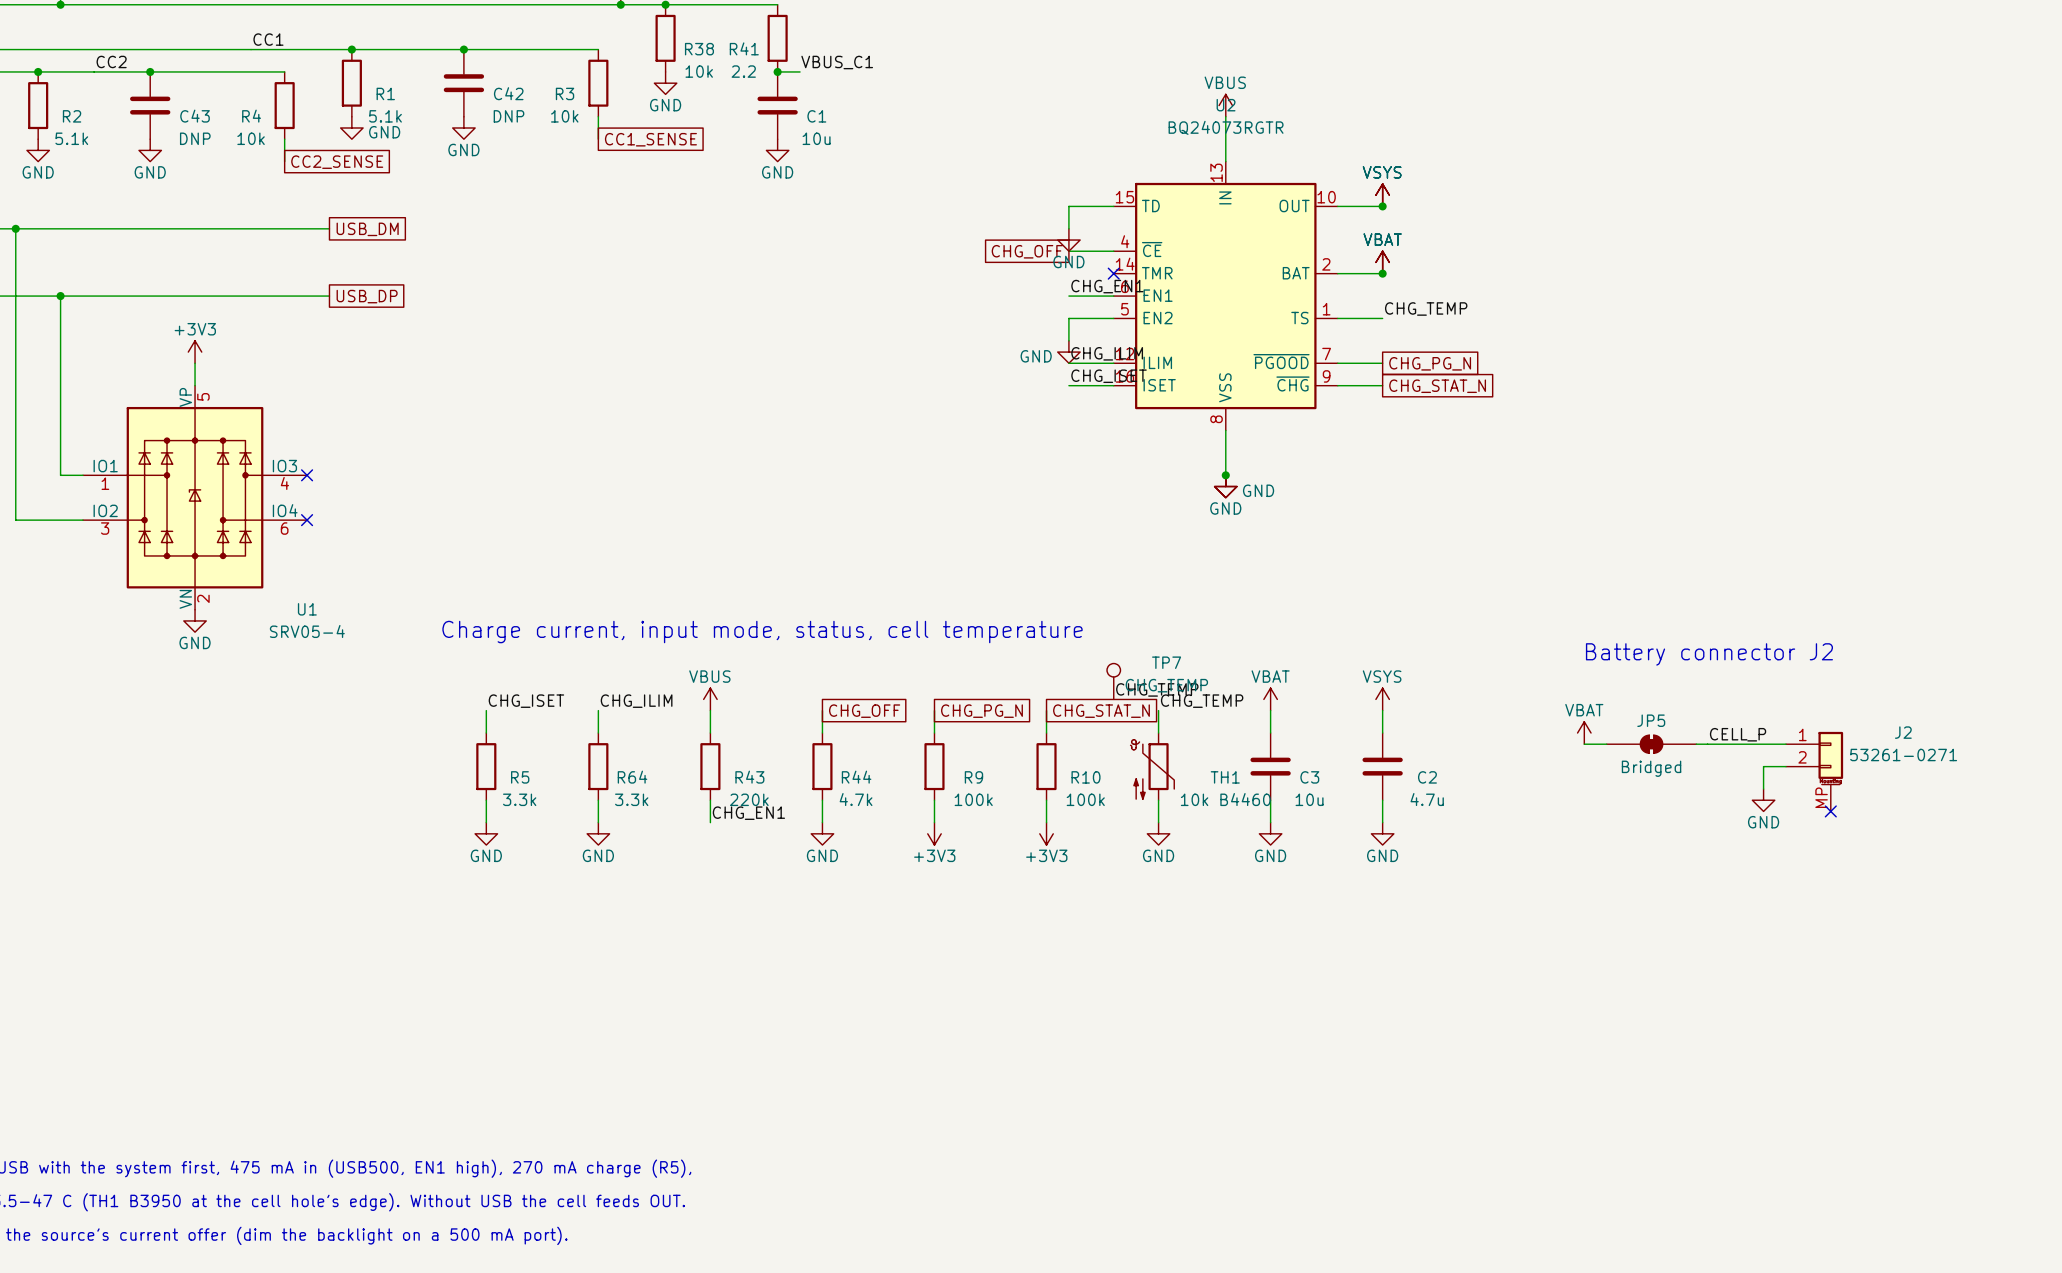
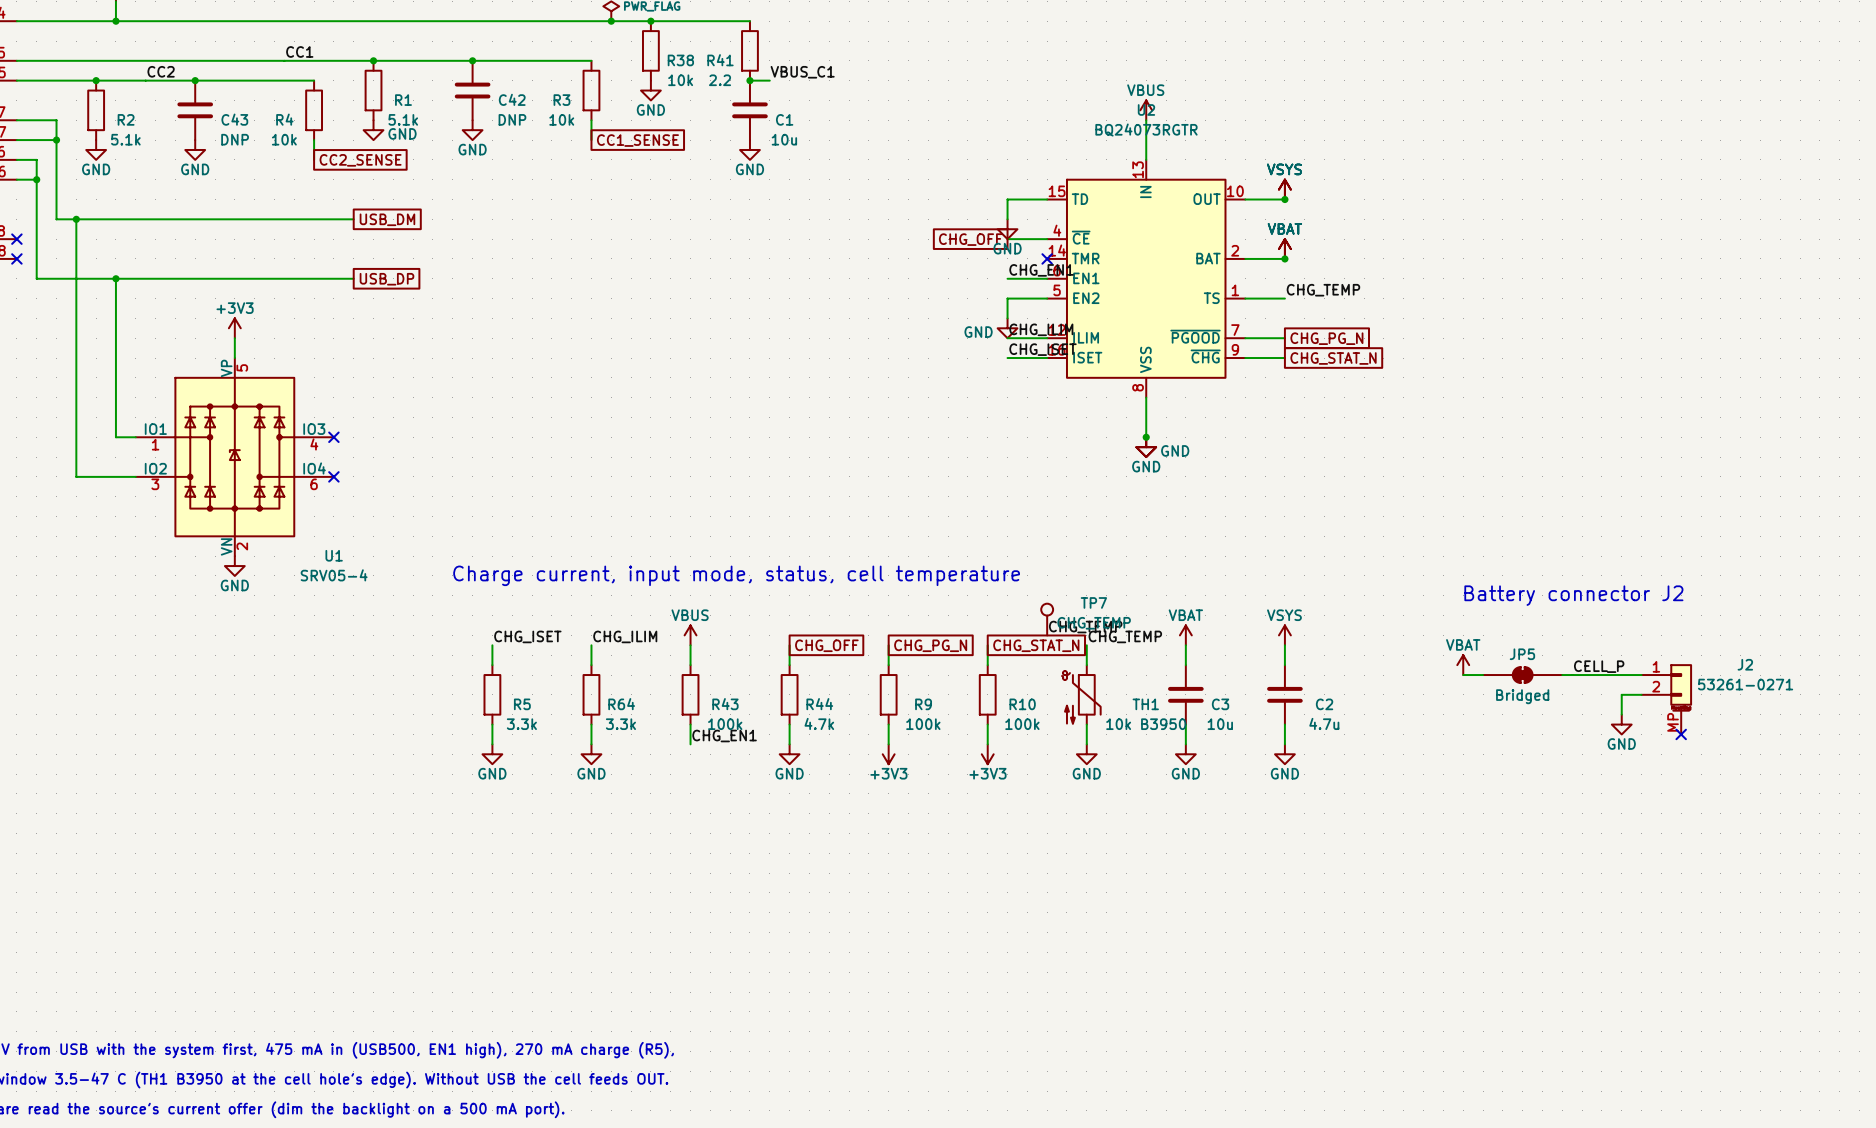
R43 value: 220k (749, 799) -> 100k (725, 724)
TH1 value: 10k B4460 (1225, 799) -> 10k B3950 (1146, 724)

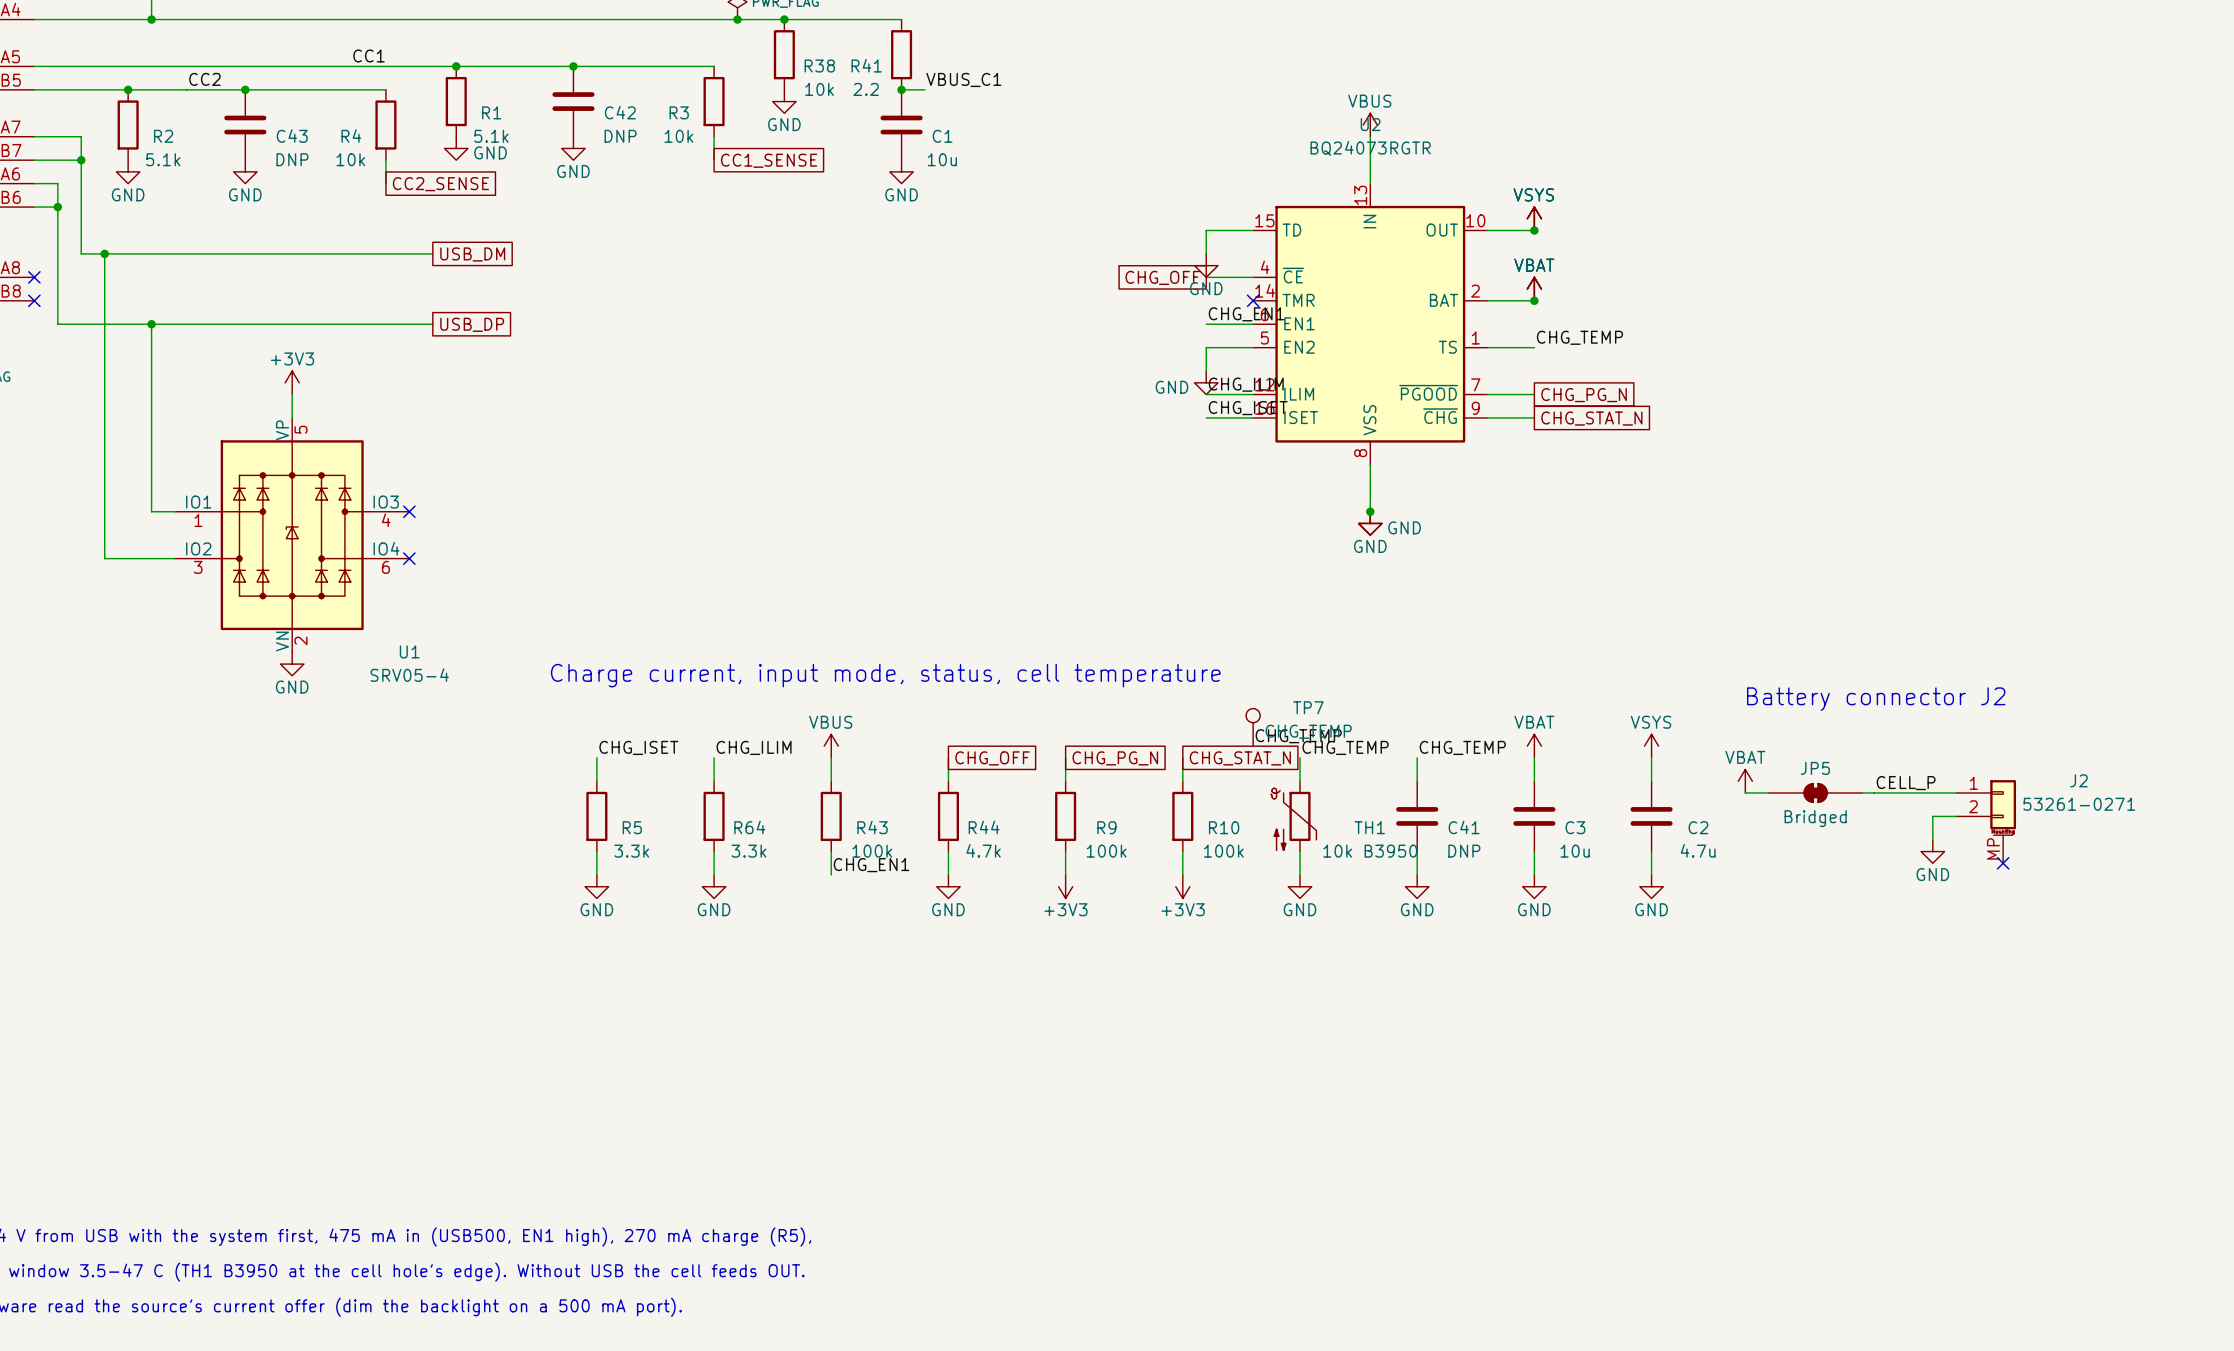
power symbol: VBAT (1185, 635) -> none
power symbol: VSYS (1284, 635) -> VBAT (1534, 746)
power symbol: none -> VSYS (1651, 746)
label: none -> CHG_TEMP (1462, 747)
wire: none -> (1651, 757) (1651, 781)
C2: none -> 4.7u (1651, 816)
C3 name: C3 (1220, 704) -> C41 (1464, 827)
C2 name: C2 (1324, 704) -> C3 (1575, 827)
C2 value: 4.7u (1324, 723) -> 10u (1575, 851)
C3 value: 10u (1220, 724) -> DNP (1464, 851)
wire: none -> (1651, 851) (1651, 875)
power symbol: none -> GND (1651, 886)

